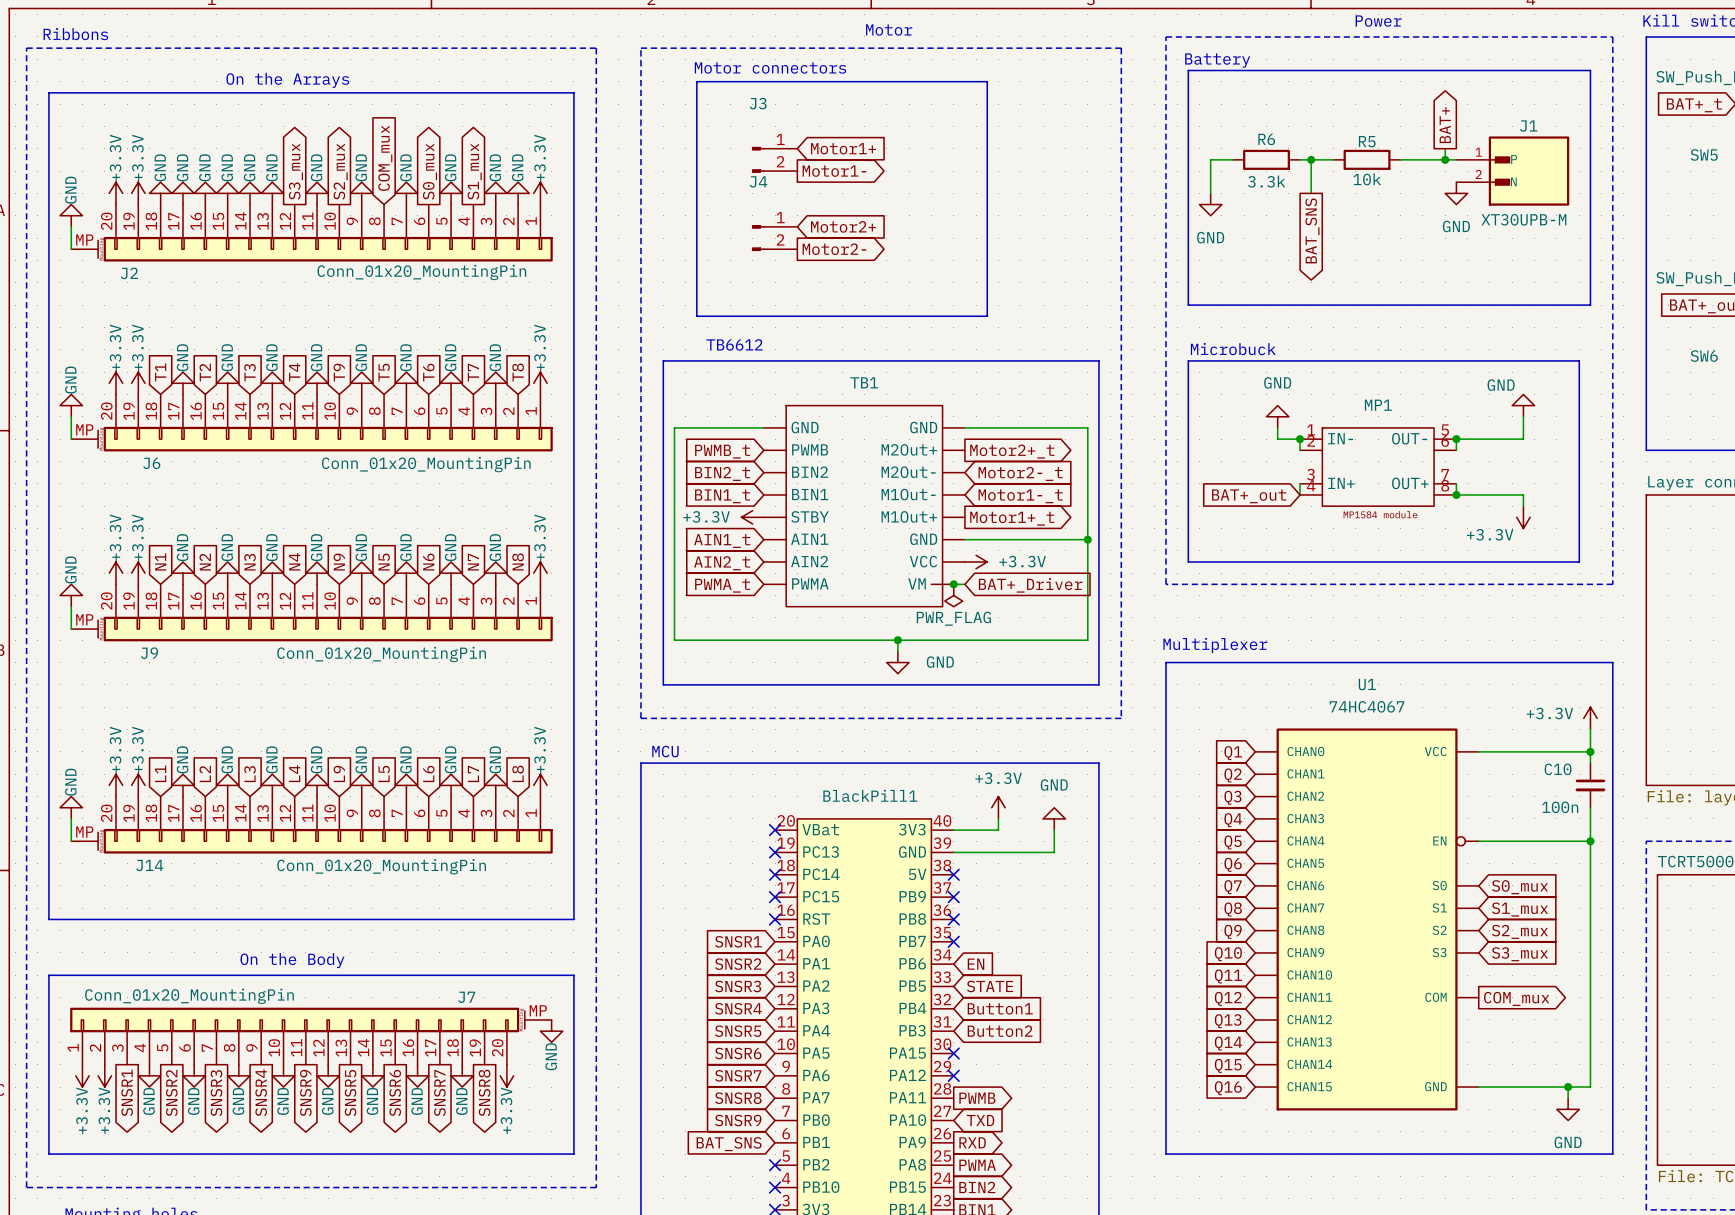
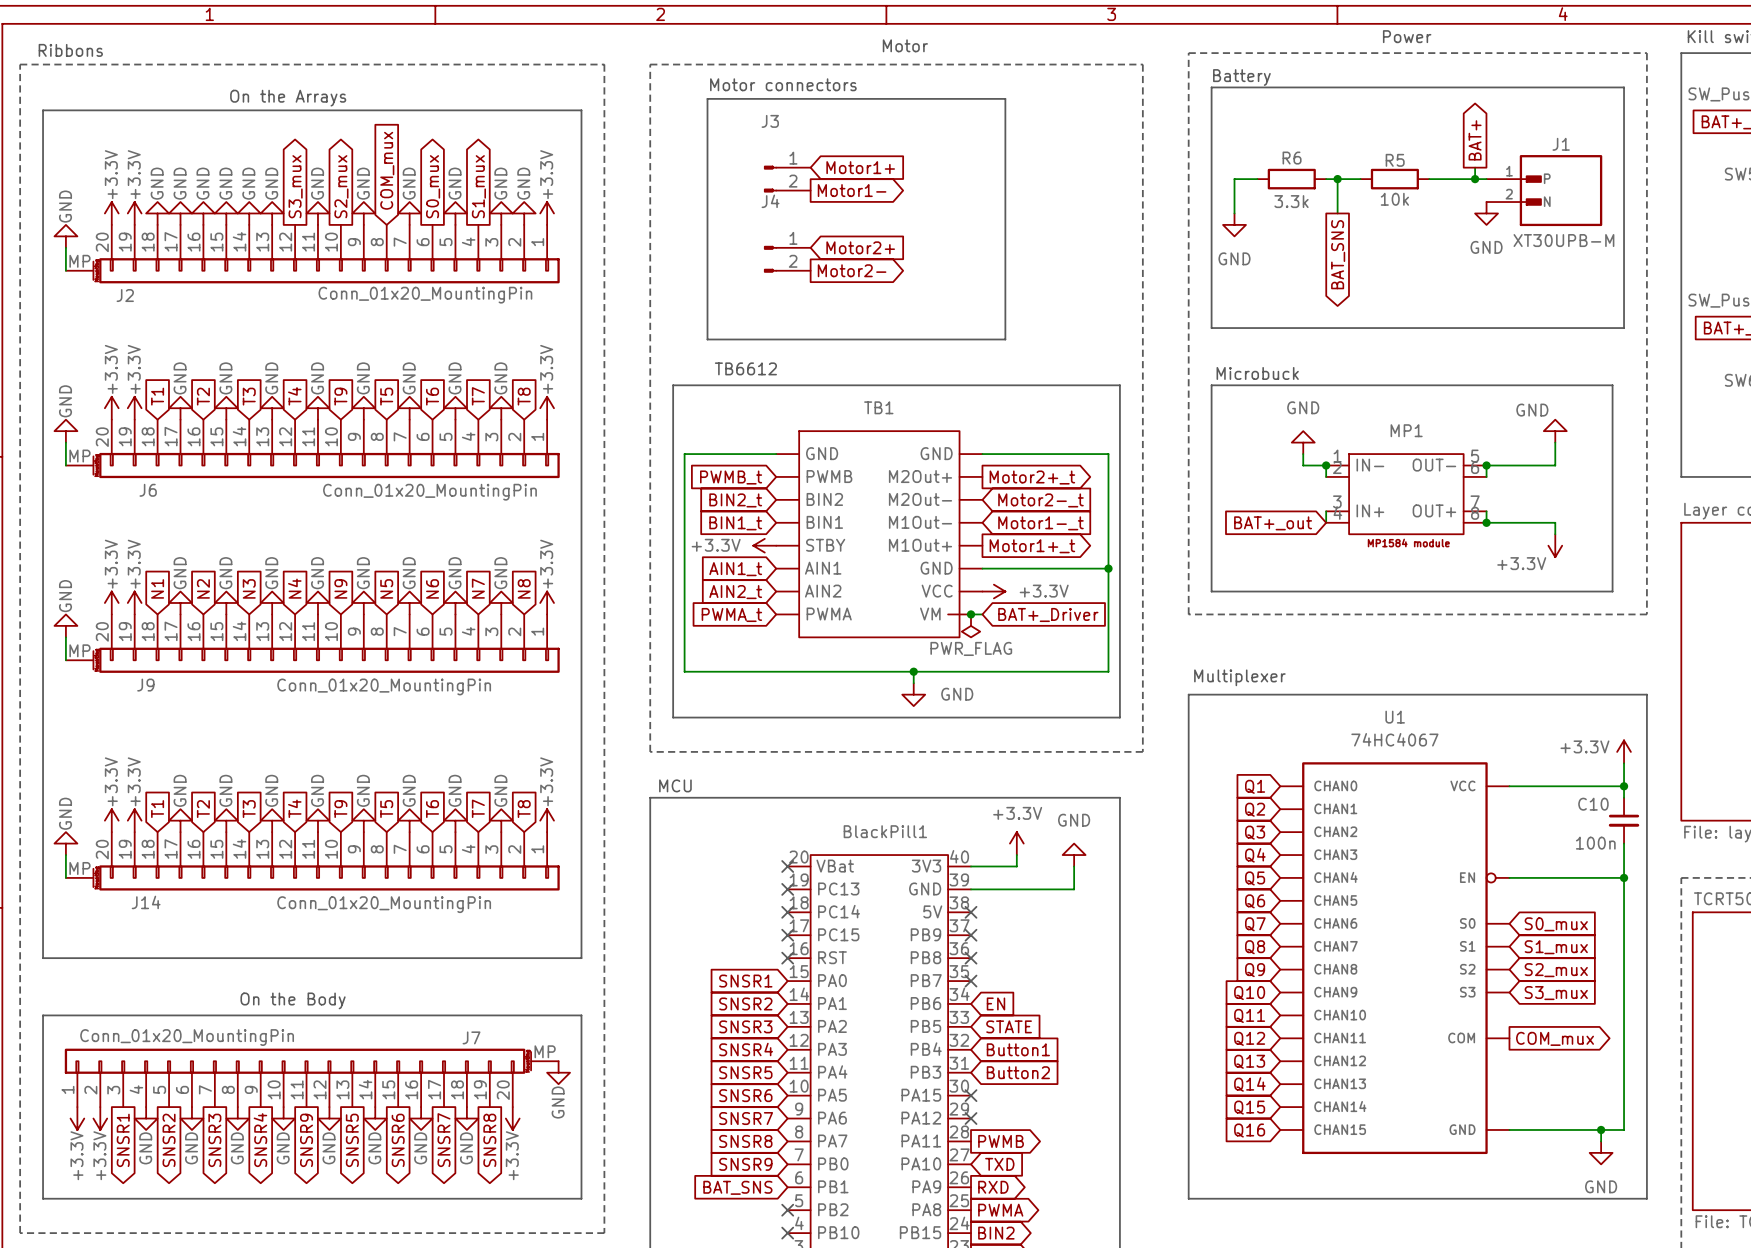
global label: L1 (160, 773) -> T1 (157, 809)
global label: L2 (205, 773) -> T2 (203, 809)
global label: L4 (294, 773) -> T4 (294, 808)
global label: L9 (339, 773) -> T9 (340, 809)
global label: L5 (384, 773) -> T5 (386, 809)
global label: L6 (428, 773) -> T6 (432, 809)
global label: L8 (518, 773) -> T8 (524, 809)
global label: L3 (250, 774) -> T3 (249, 809)
global label: L7 (473, 774) -> T7 (478, 808)

